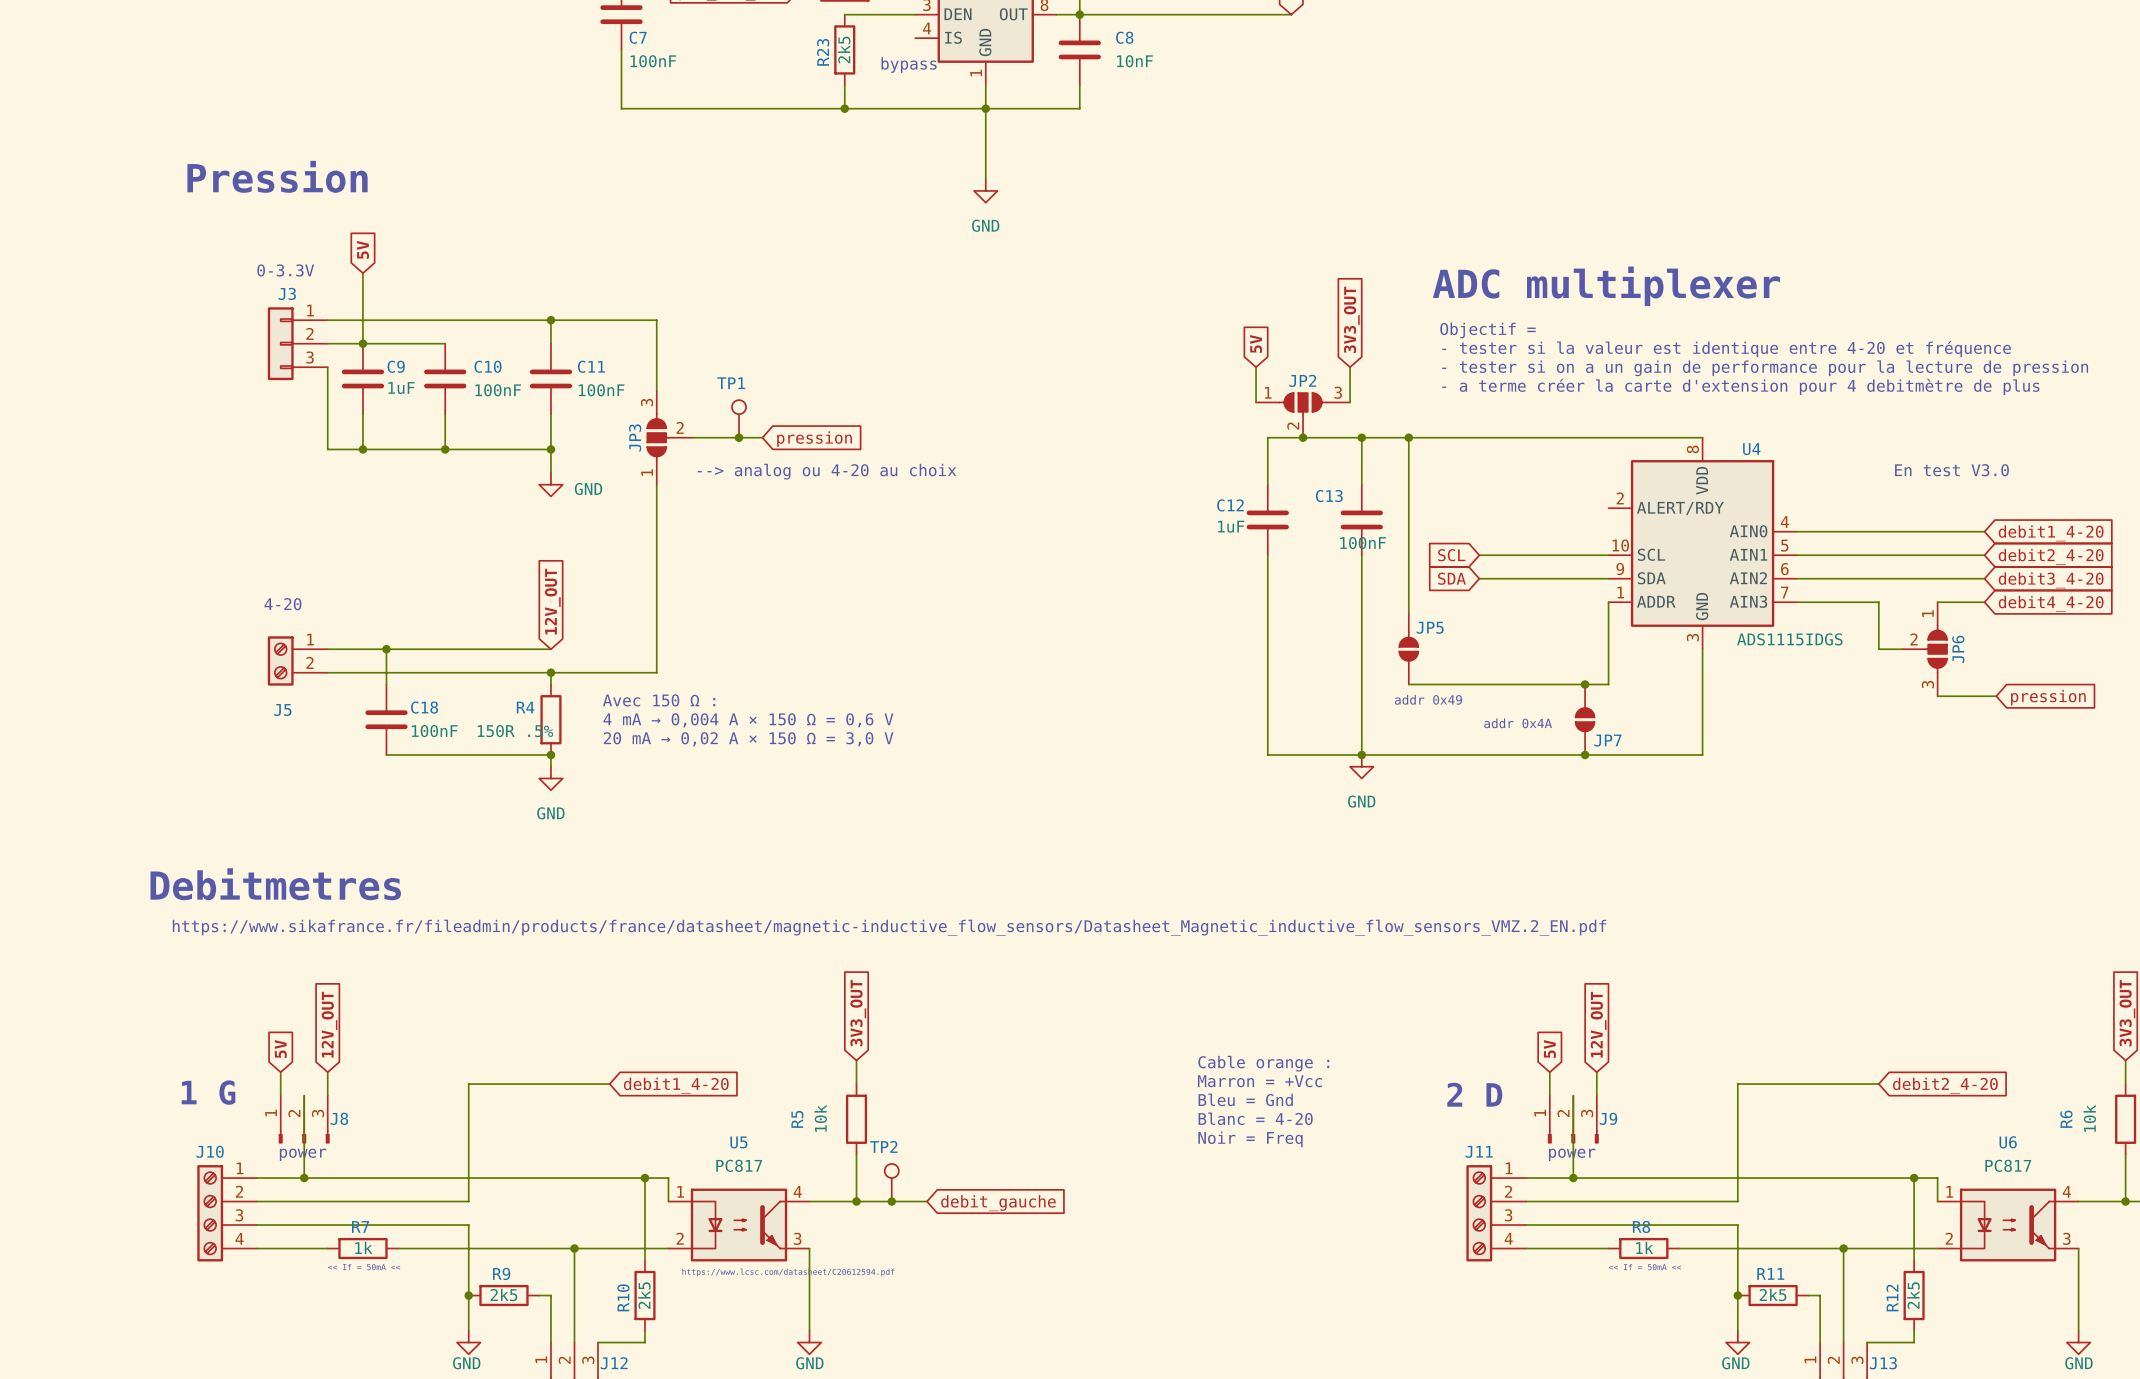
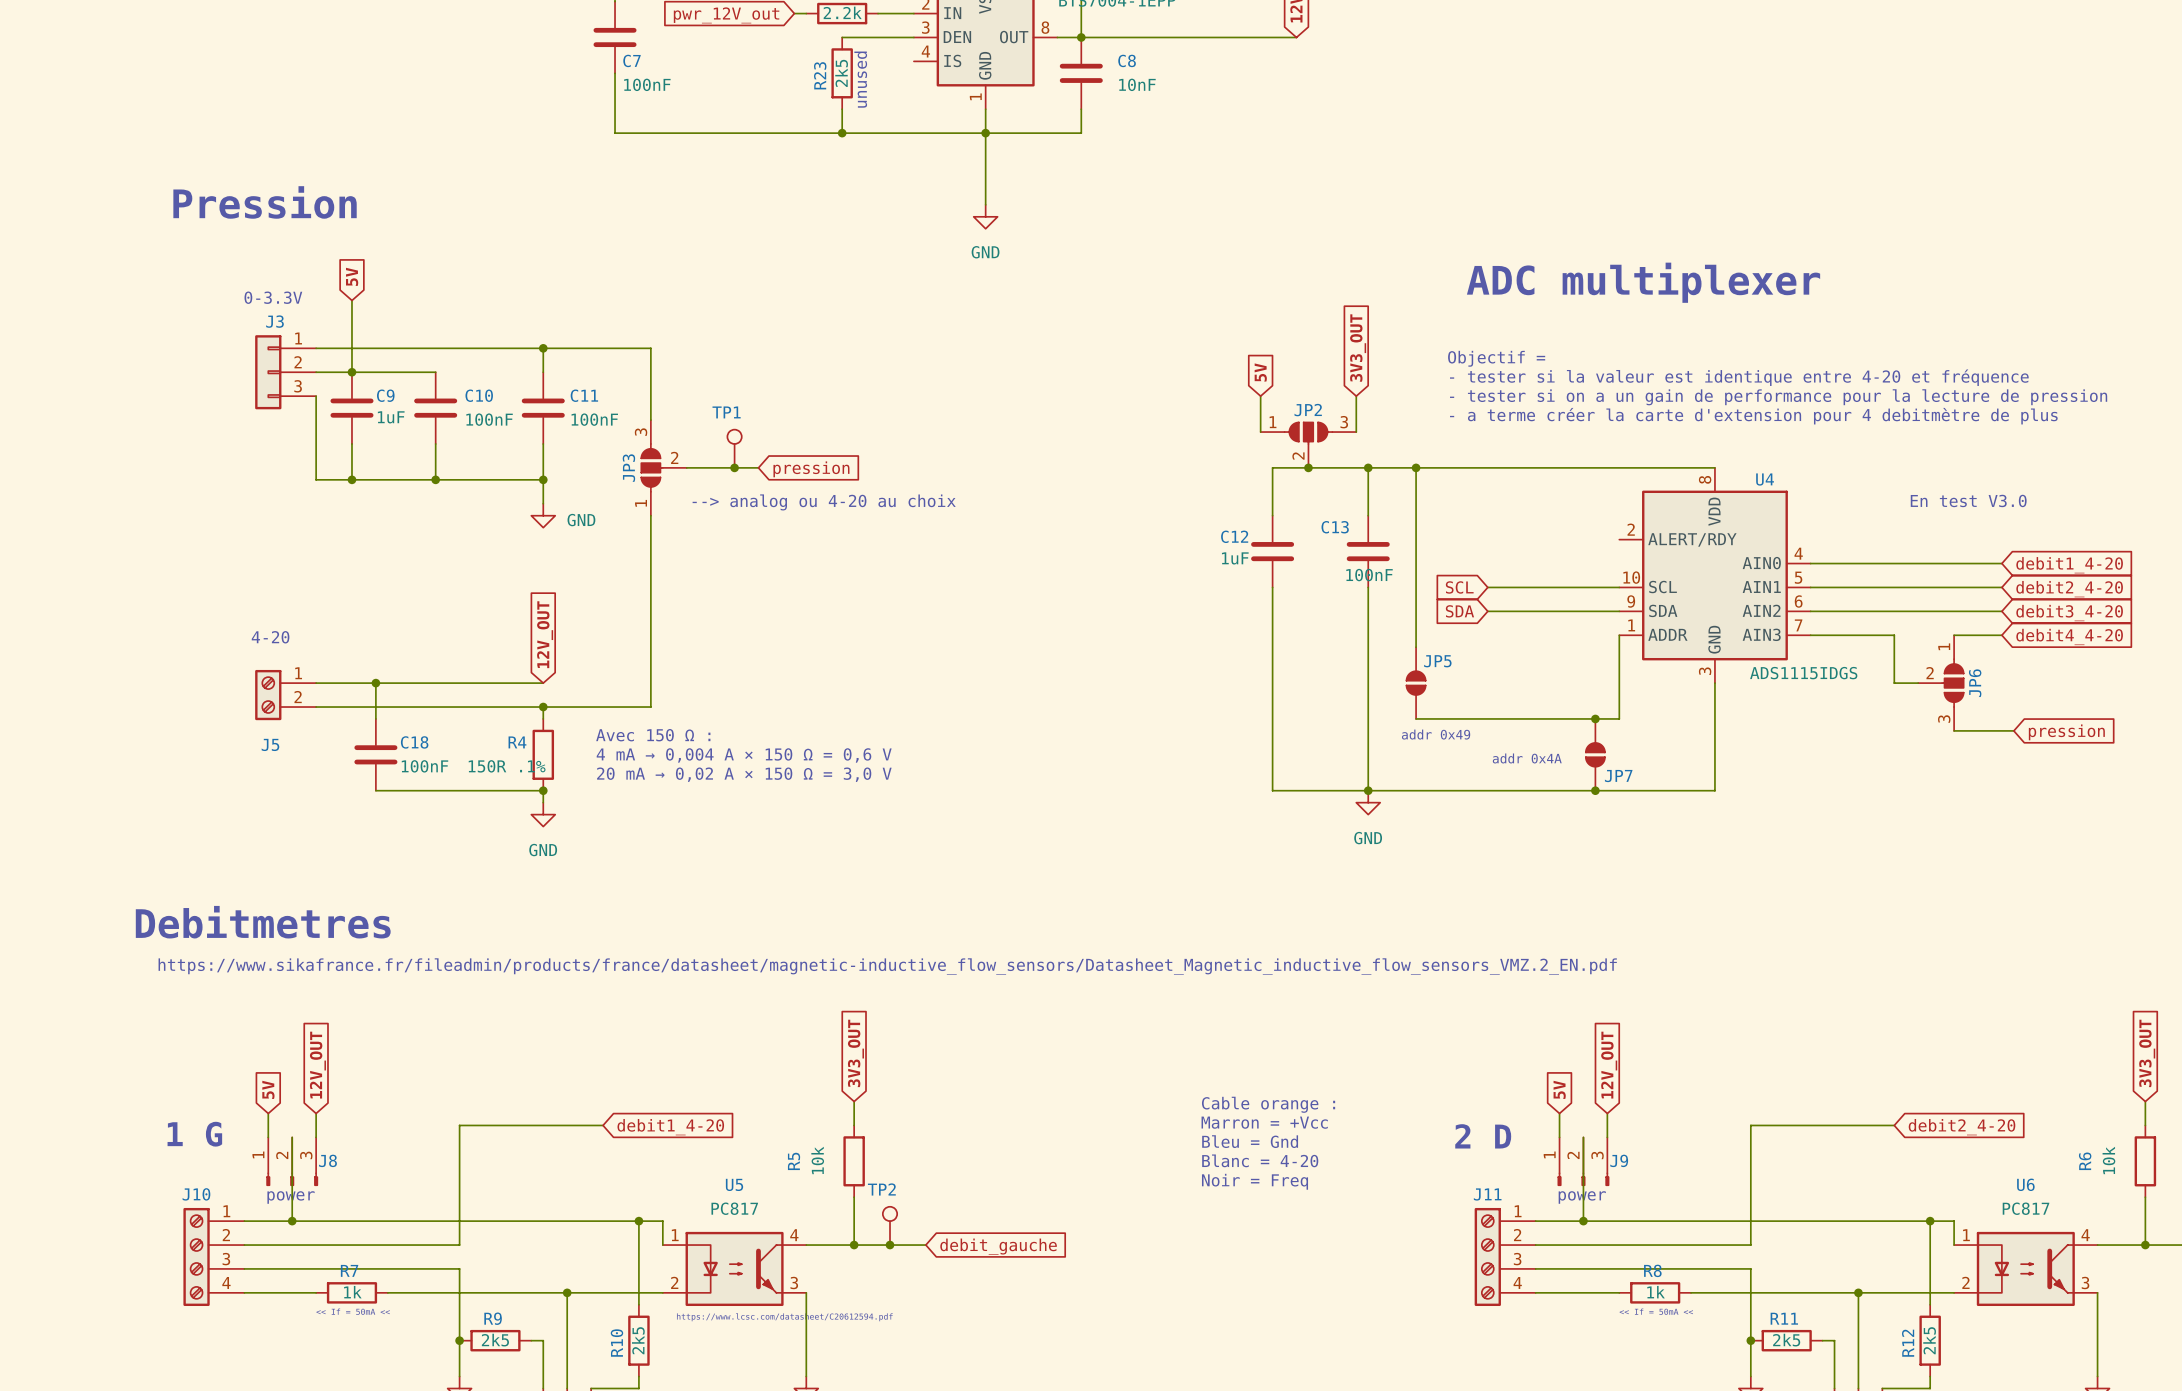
text: none -> unused (860, 79)
text: bypass (909, 65) -> none
text position: ADC multiplexer (1606, 286) -> ADC multiplexer (1643, 282)
R4 value: 150R .5% (515, 731) -> 150R .1% (507, 766)

